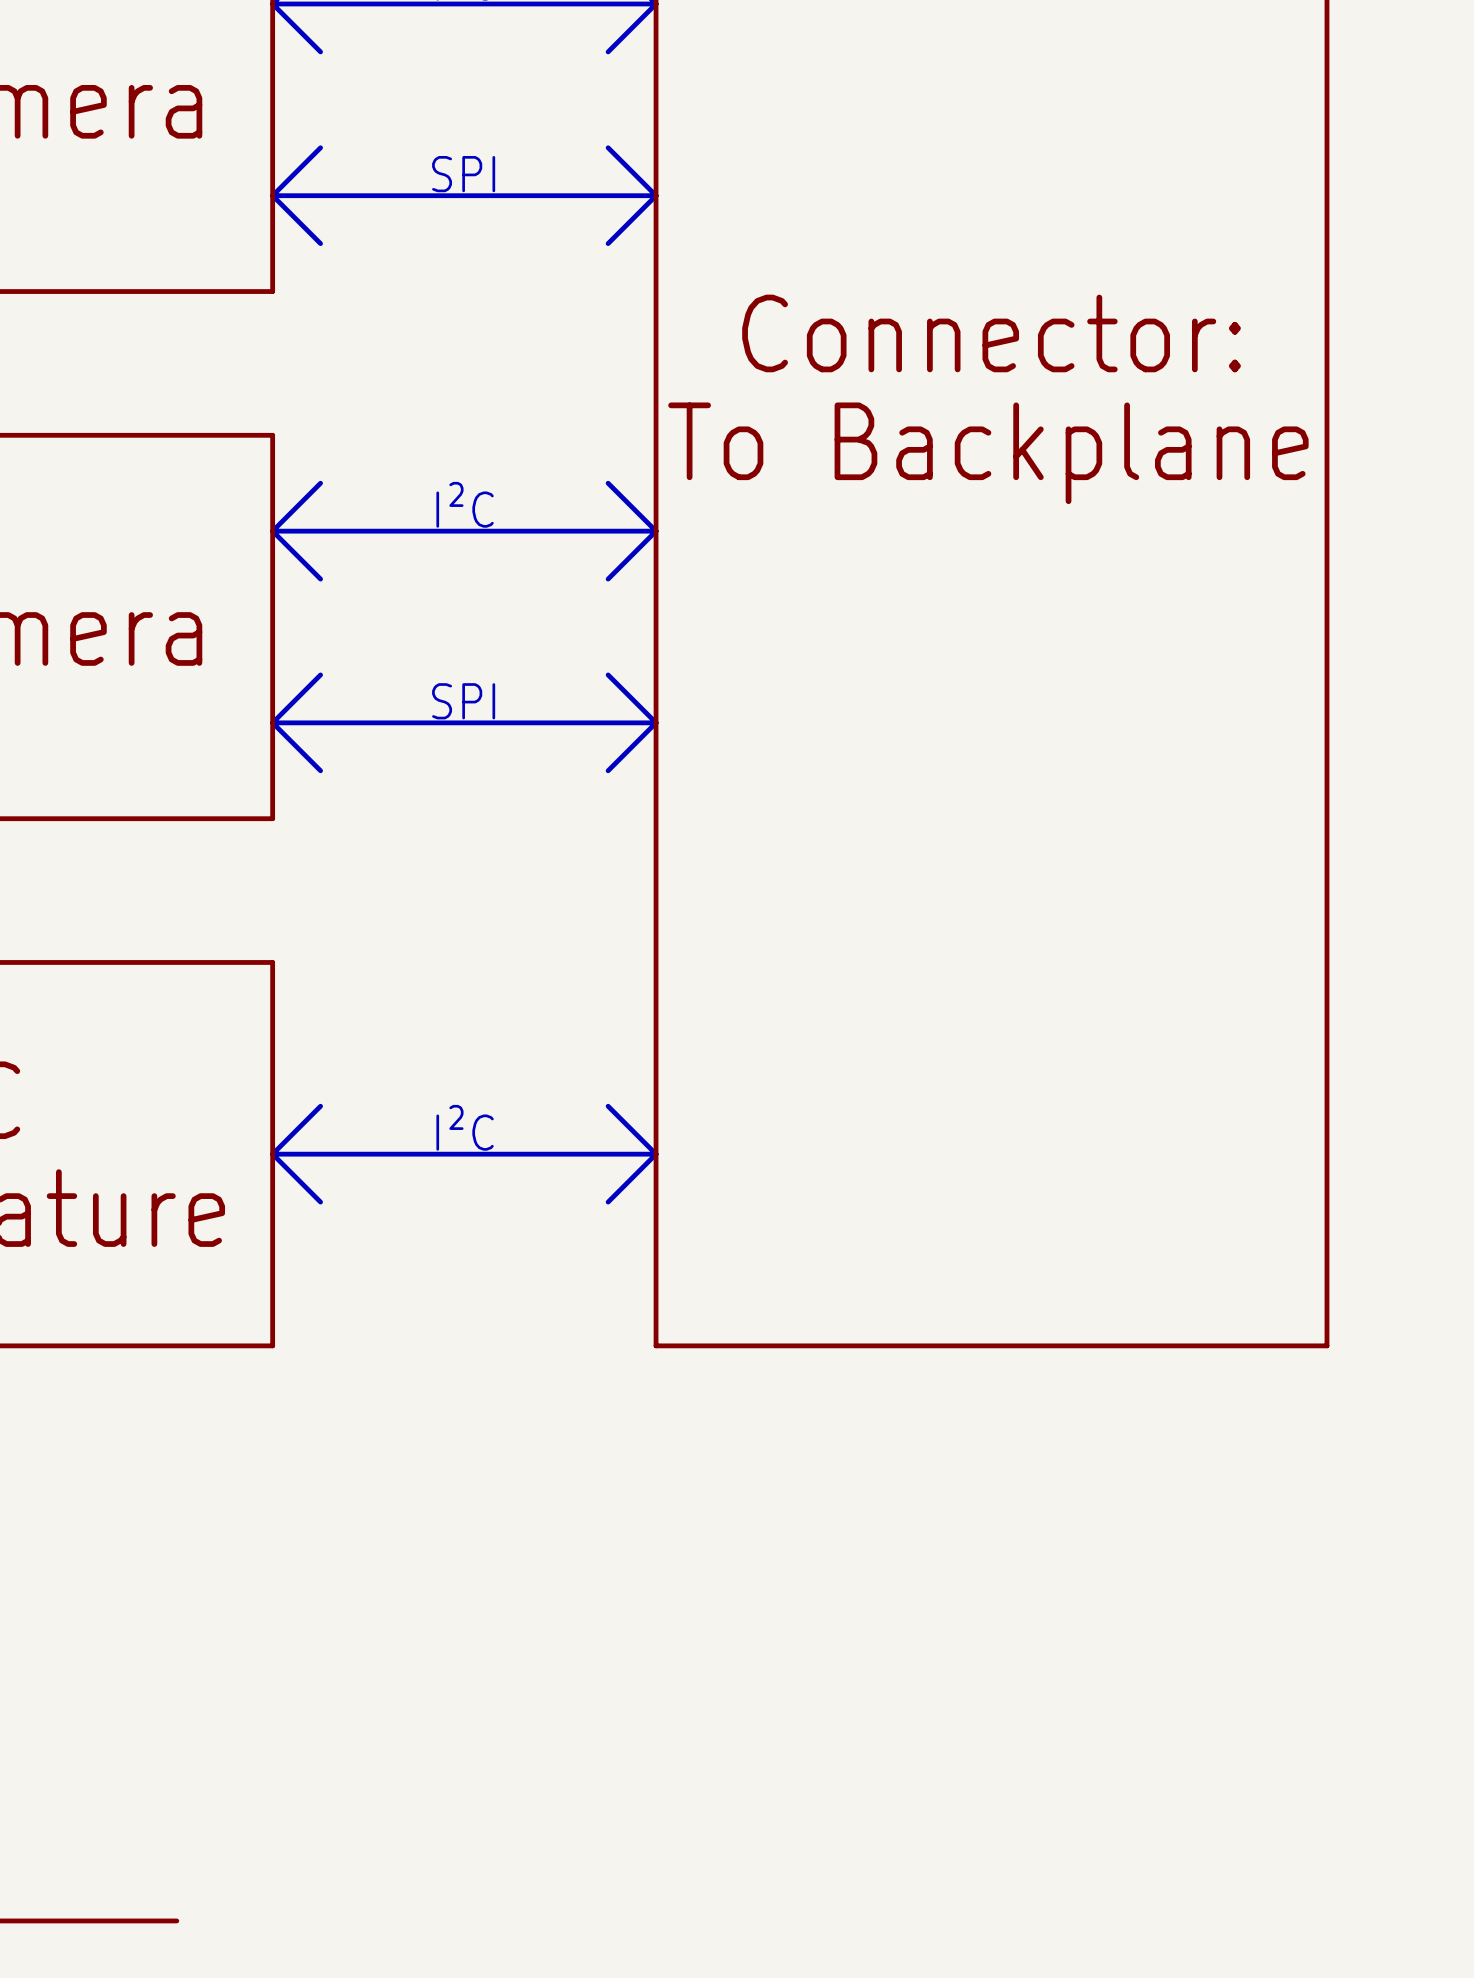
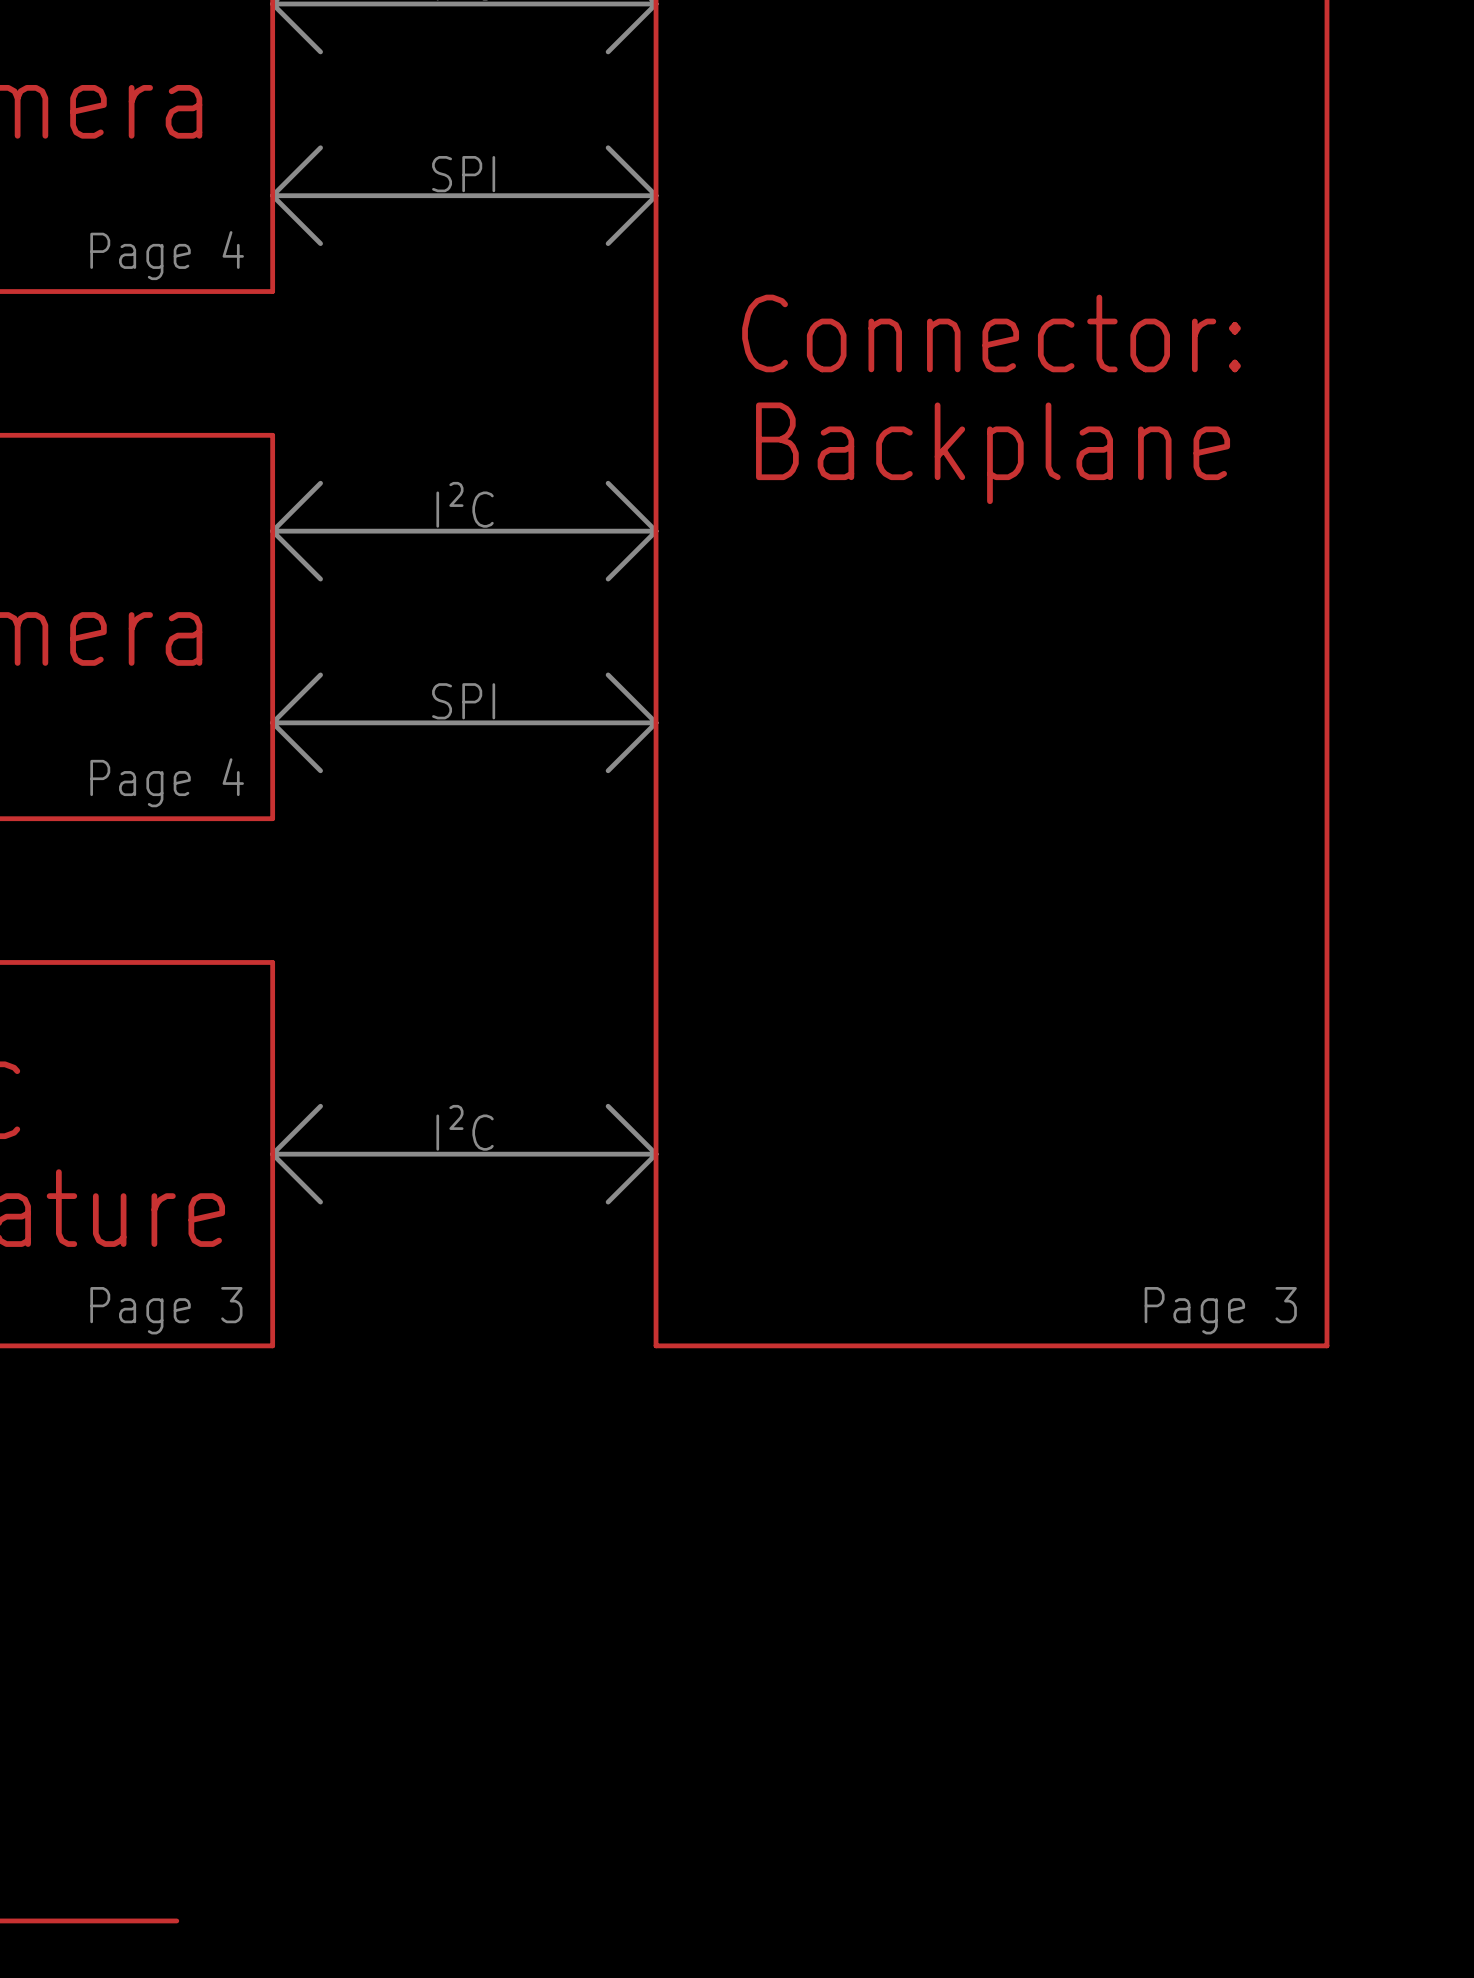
text: none -> Page 4 (167, 255)
text: To Backplane (988, 453) -> Backplane (993, 453)
text: none -> Page 4 (167, 782)
text: none -> Page 3 (166, 1310)
text: none -> Page 3 (1220, 1310)

